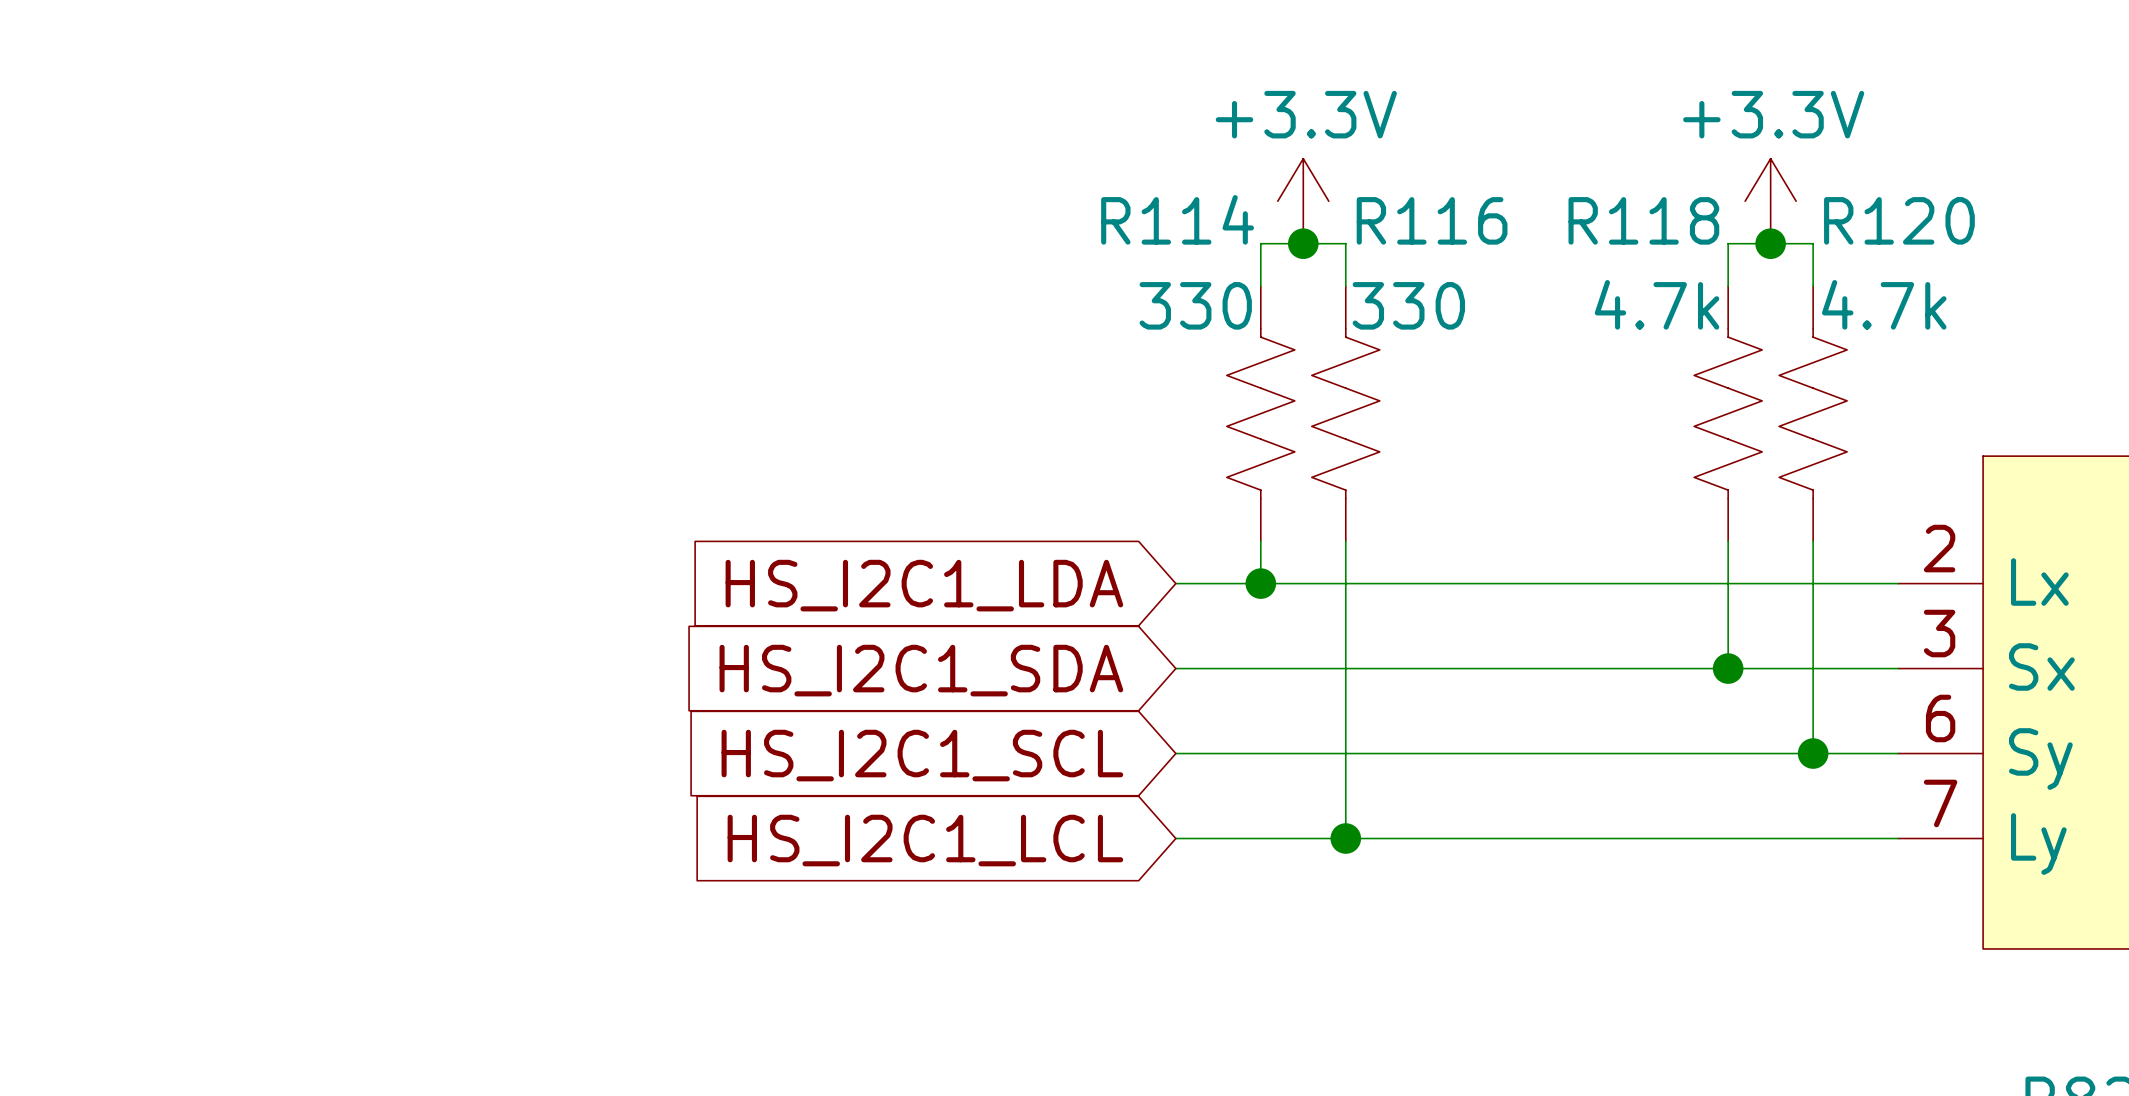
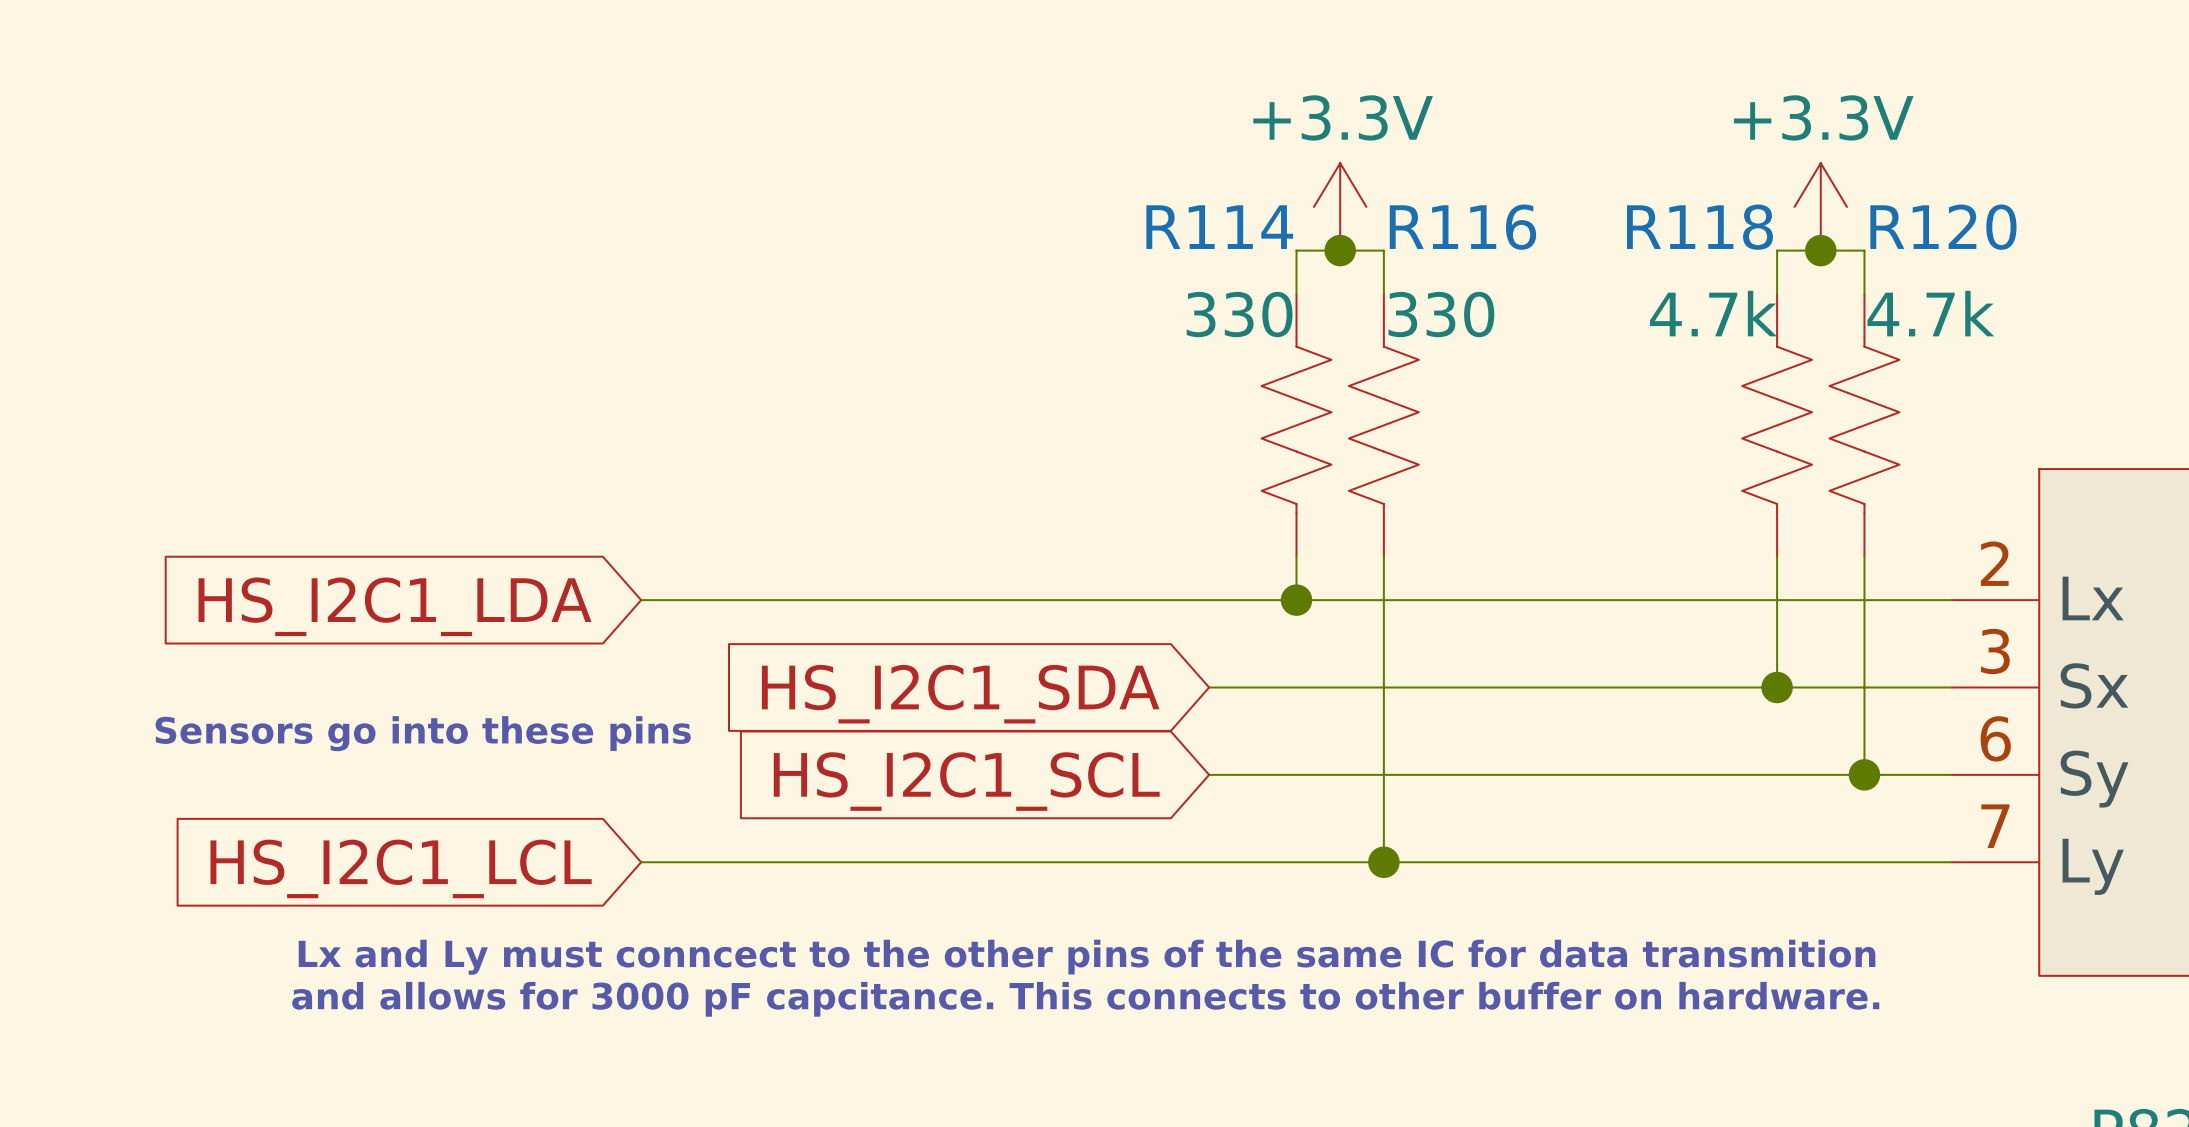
wire: none -> (641, 600) (1209, 600)
global label position: HS_I2C1_LDA (924, 585) -> HS_I2C1_LDA (395, 606)
text: none -> Sensors go into these pins (423, 733)
wire: none -> (641, 862) (1209, 862)
global label position: HS_I2C1_LCL (925, 840) -> HS_I2C1_LCL (401, 868)
text: none -> Lx and Ly must conncect to the other pins of the same IC for data transmition (1087, 957)
text: none -> and allows for 3000 pF capcitance. This connects to other buffer on hardware. (1085, 999)

